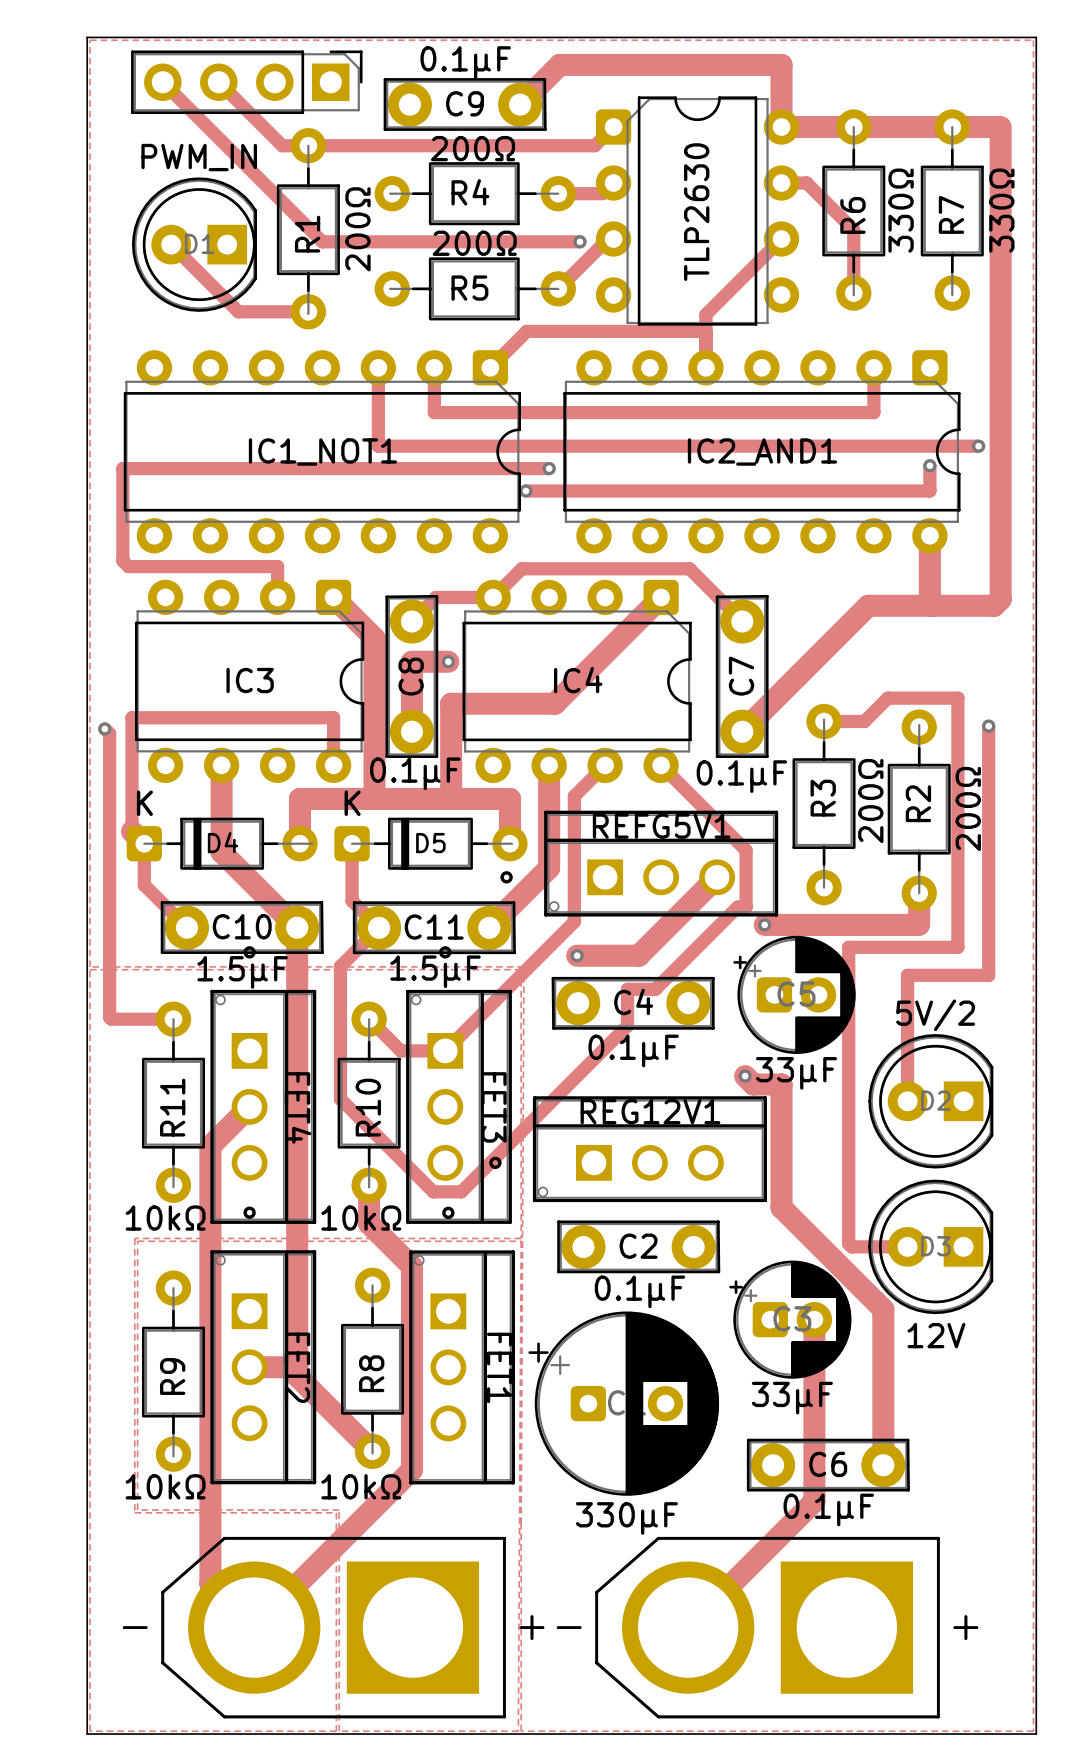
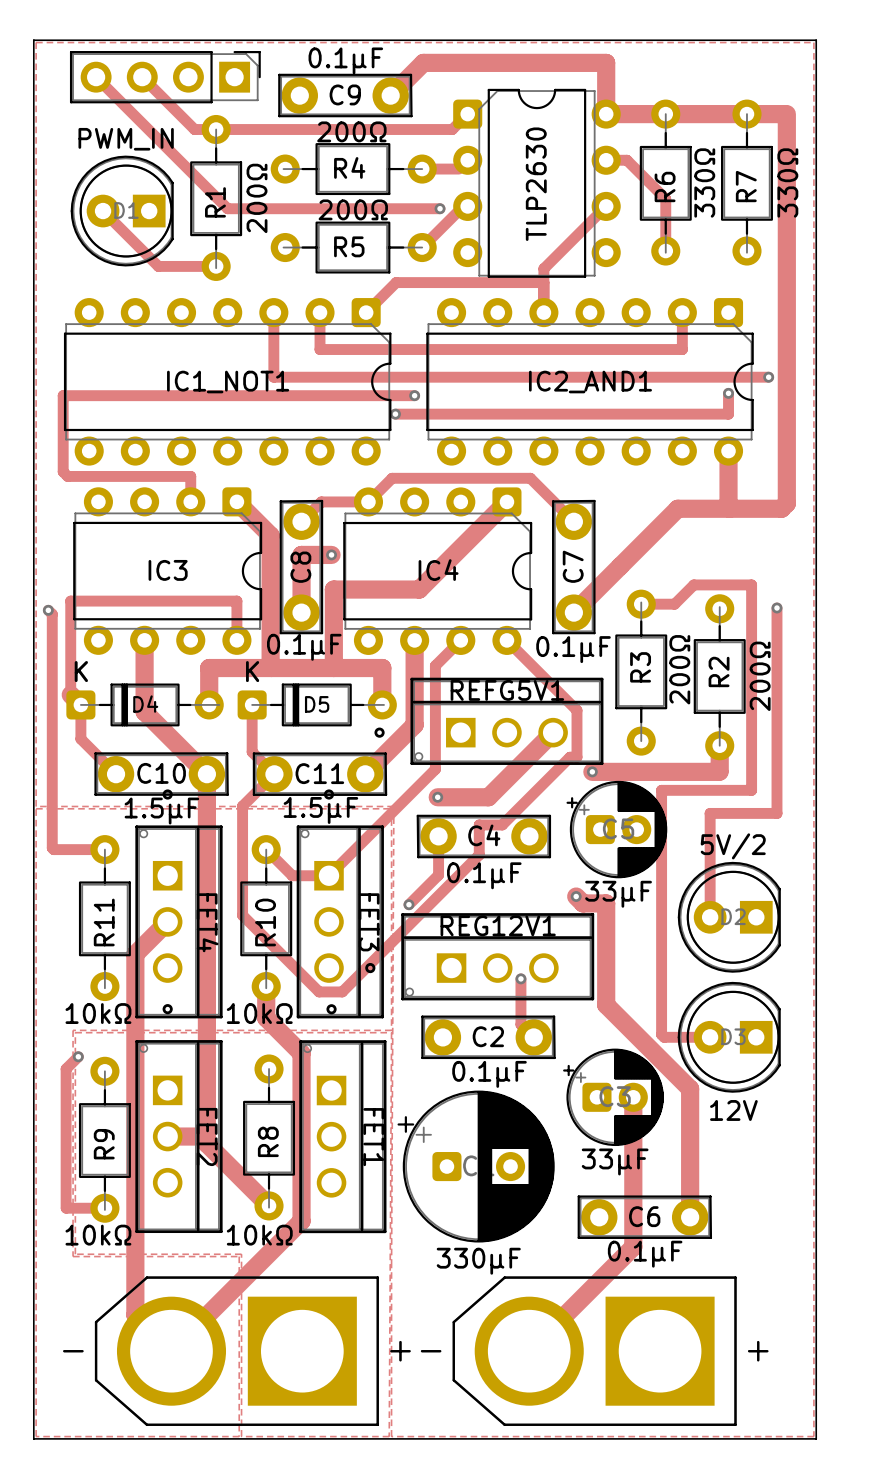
track: none -> (438, 836) (438, 875) (408, 904)
via: none -> (408, 904)
track: none -> (520, 978) (520, 1024) (533, 1037)
via: none -> (520, 978)
track: none -> (78, 1056) (66, 1068) (66, 1208) (104, 1208)
via: none -> (78, 1056)

